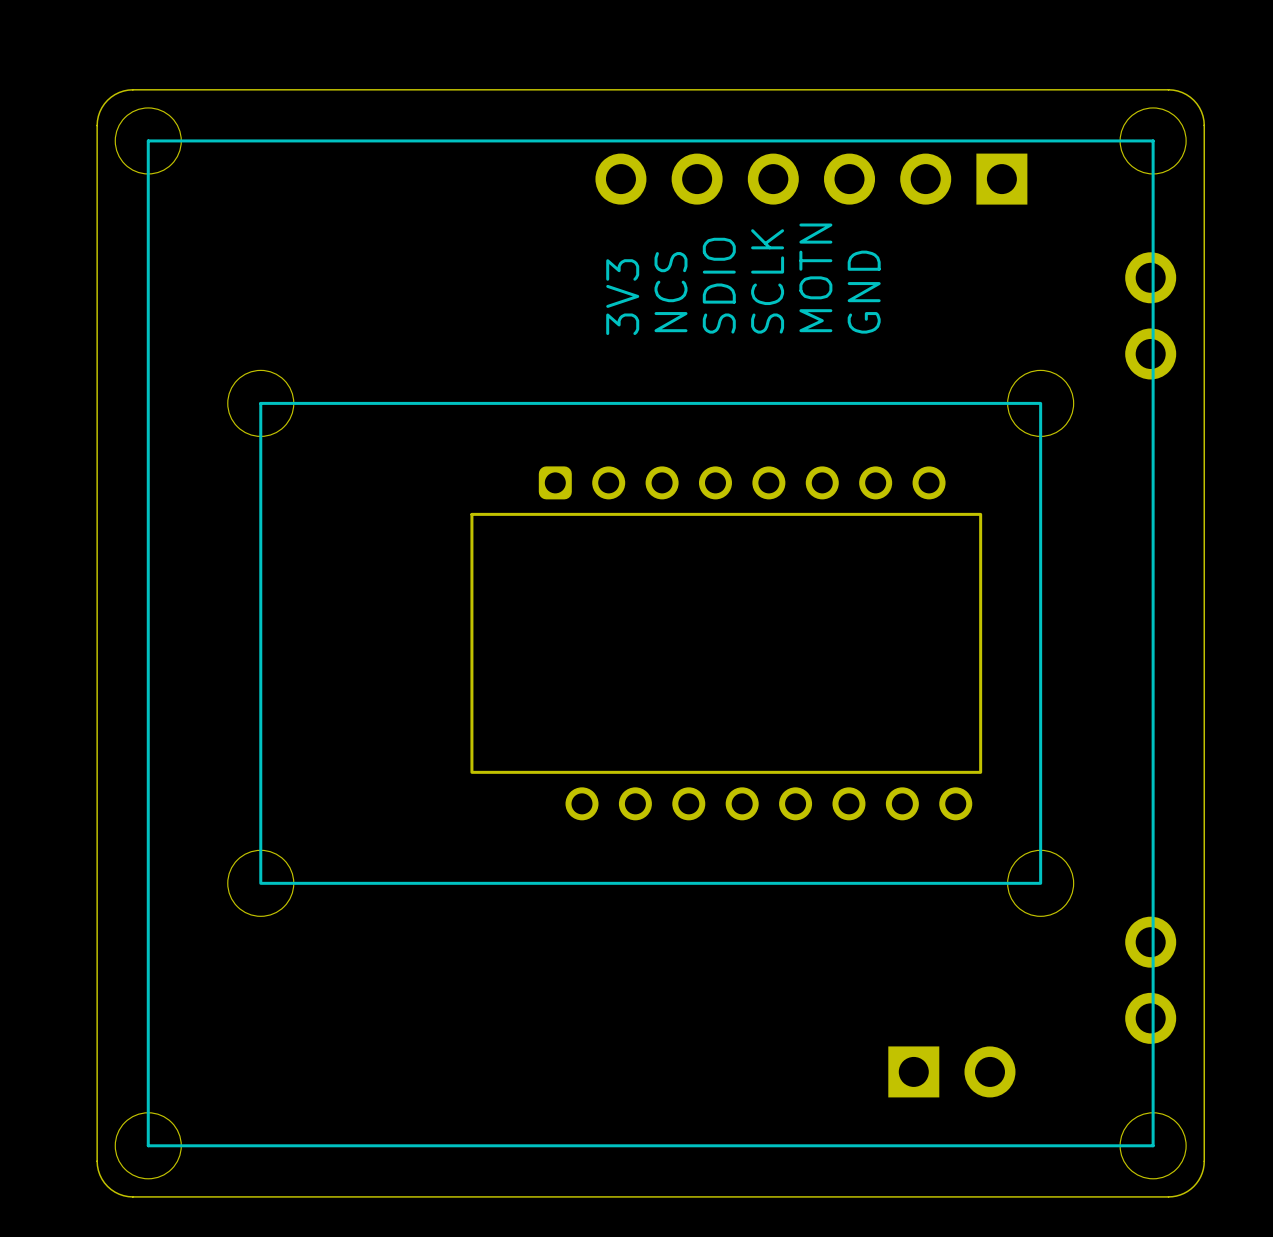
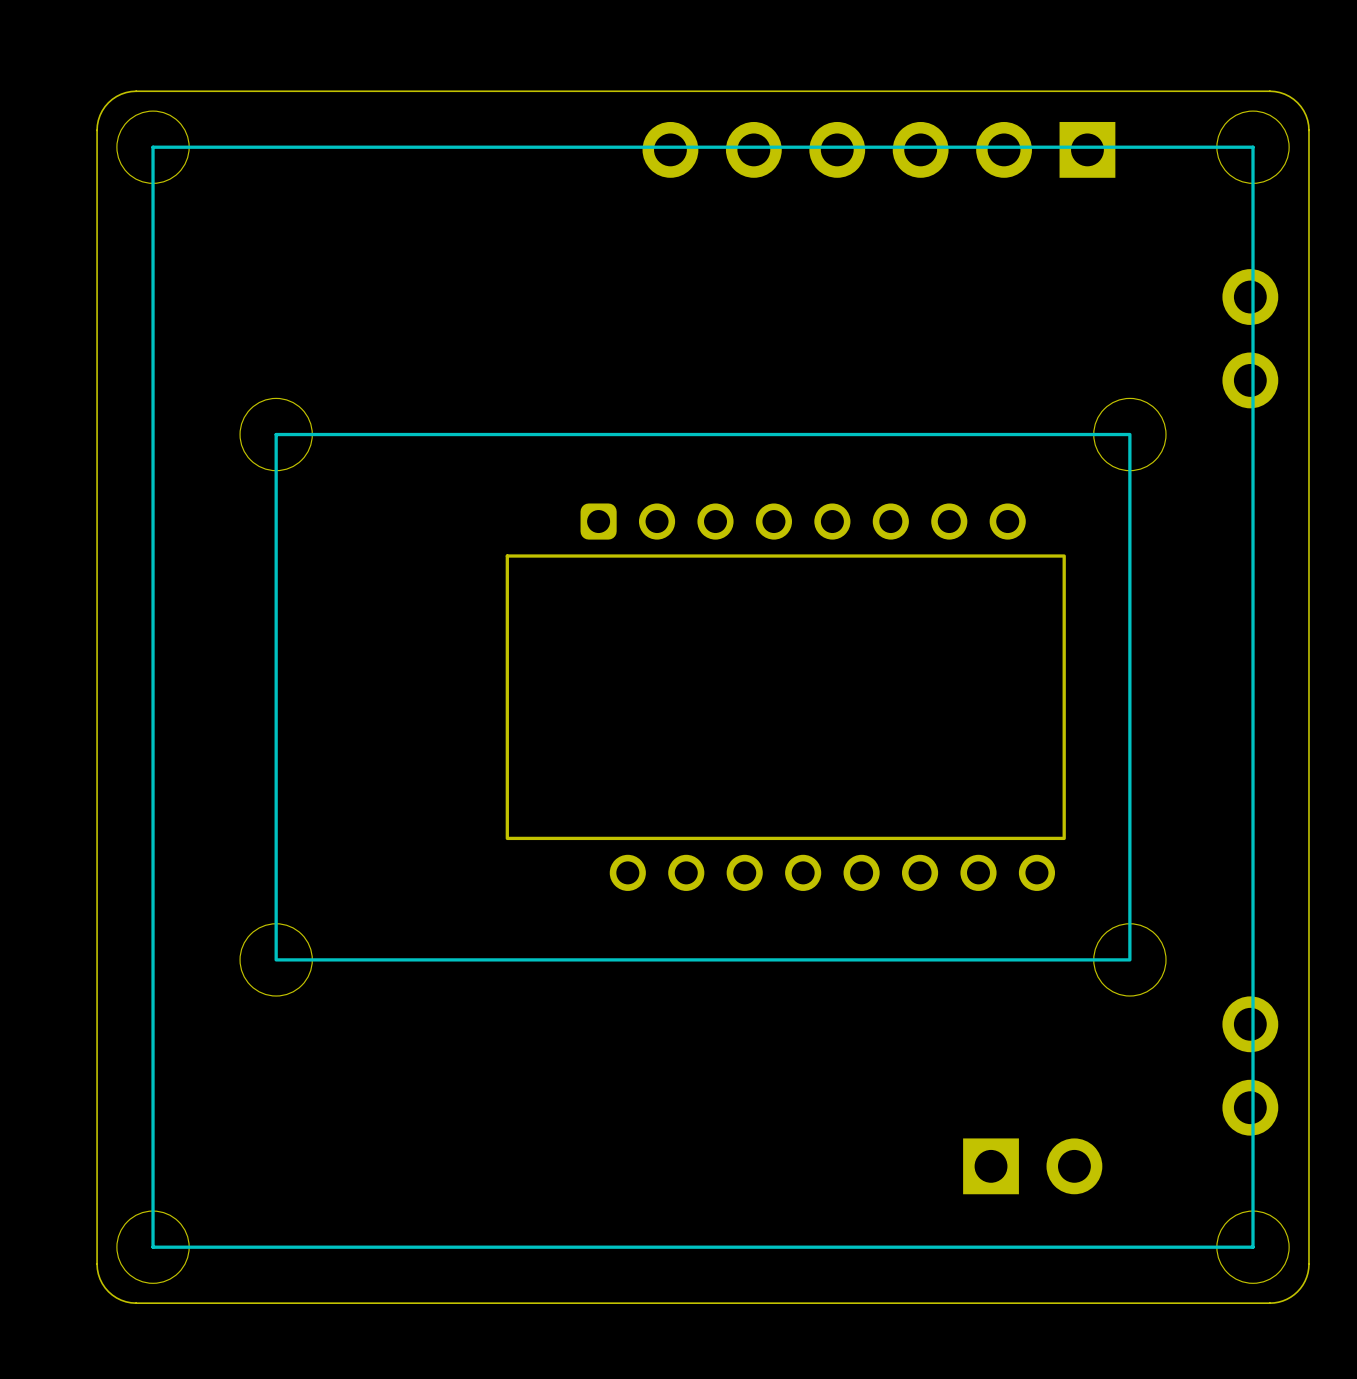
part position: (811, 179) -> (878, 149)
text: MOTN (815, 277) -> none
text: SCLK (767, 281) -> none
text: SDIO (719, 285) -> none
text: NCS (671, 292) -> none
text: GND (864, 292) -> none
text: 3V3 (622, 297) -> none

